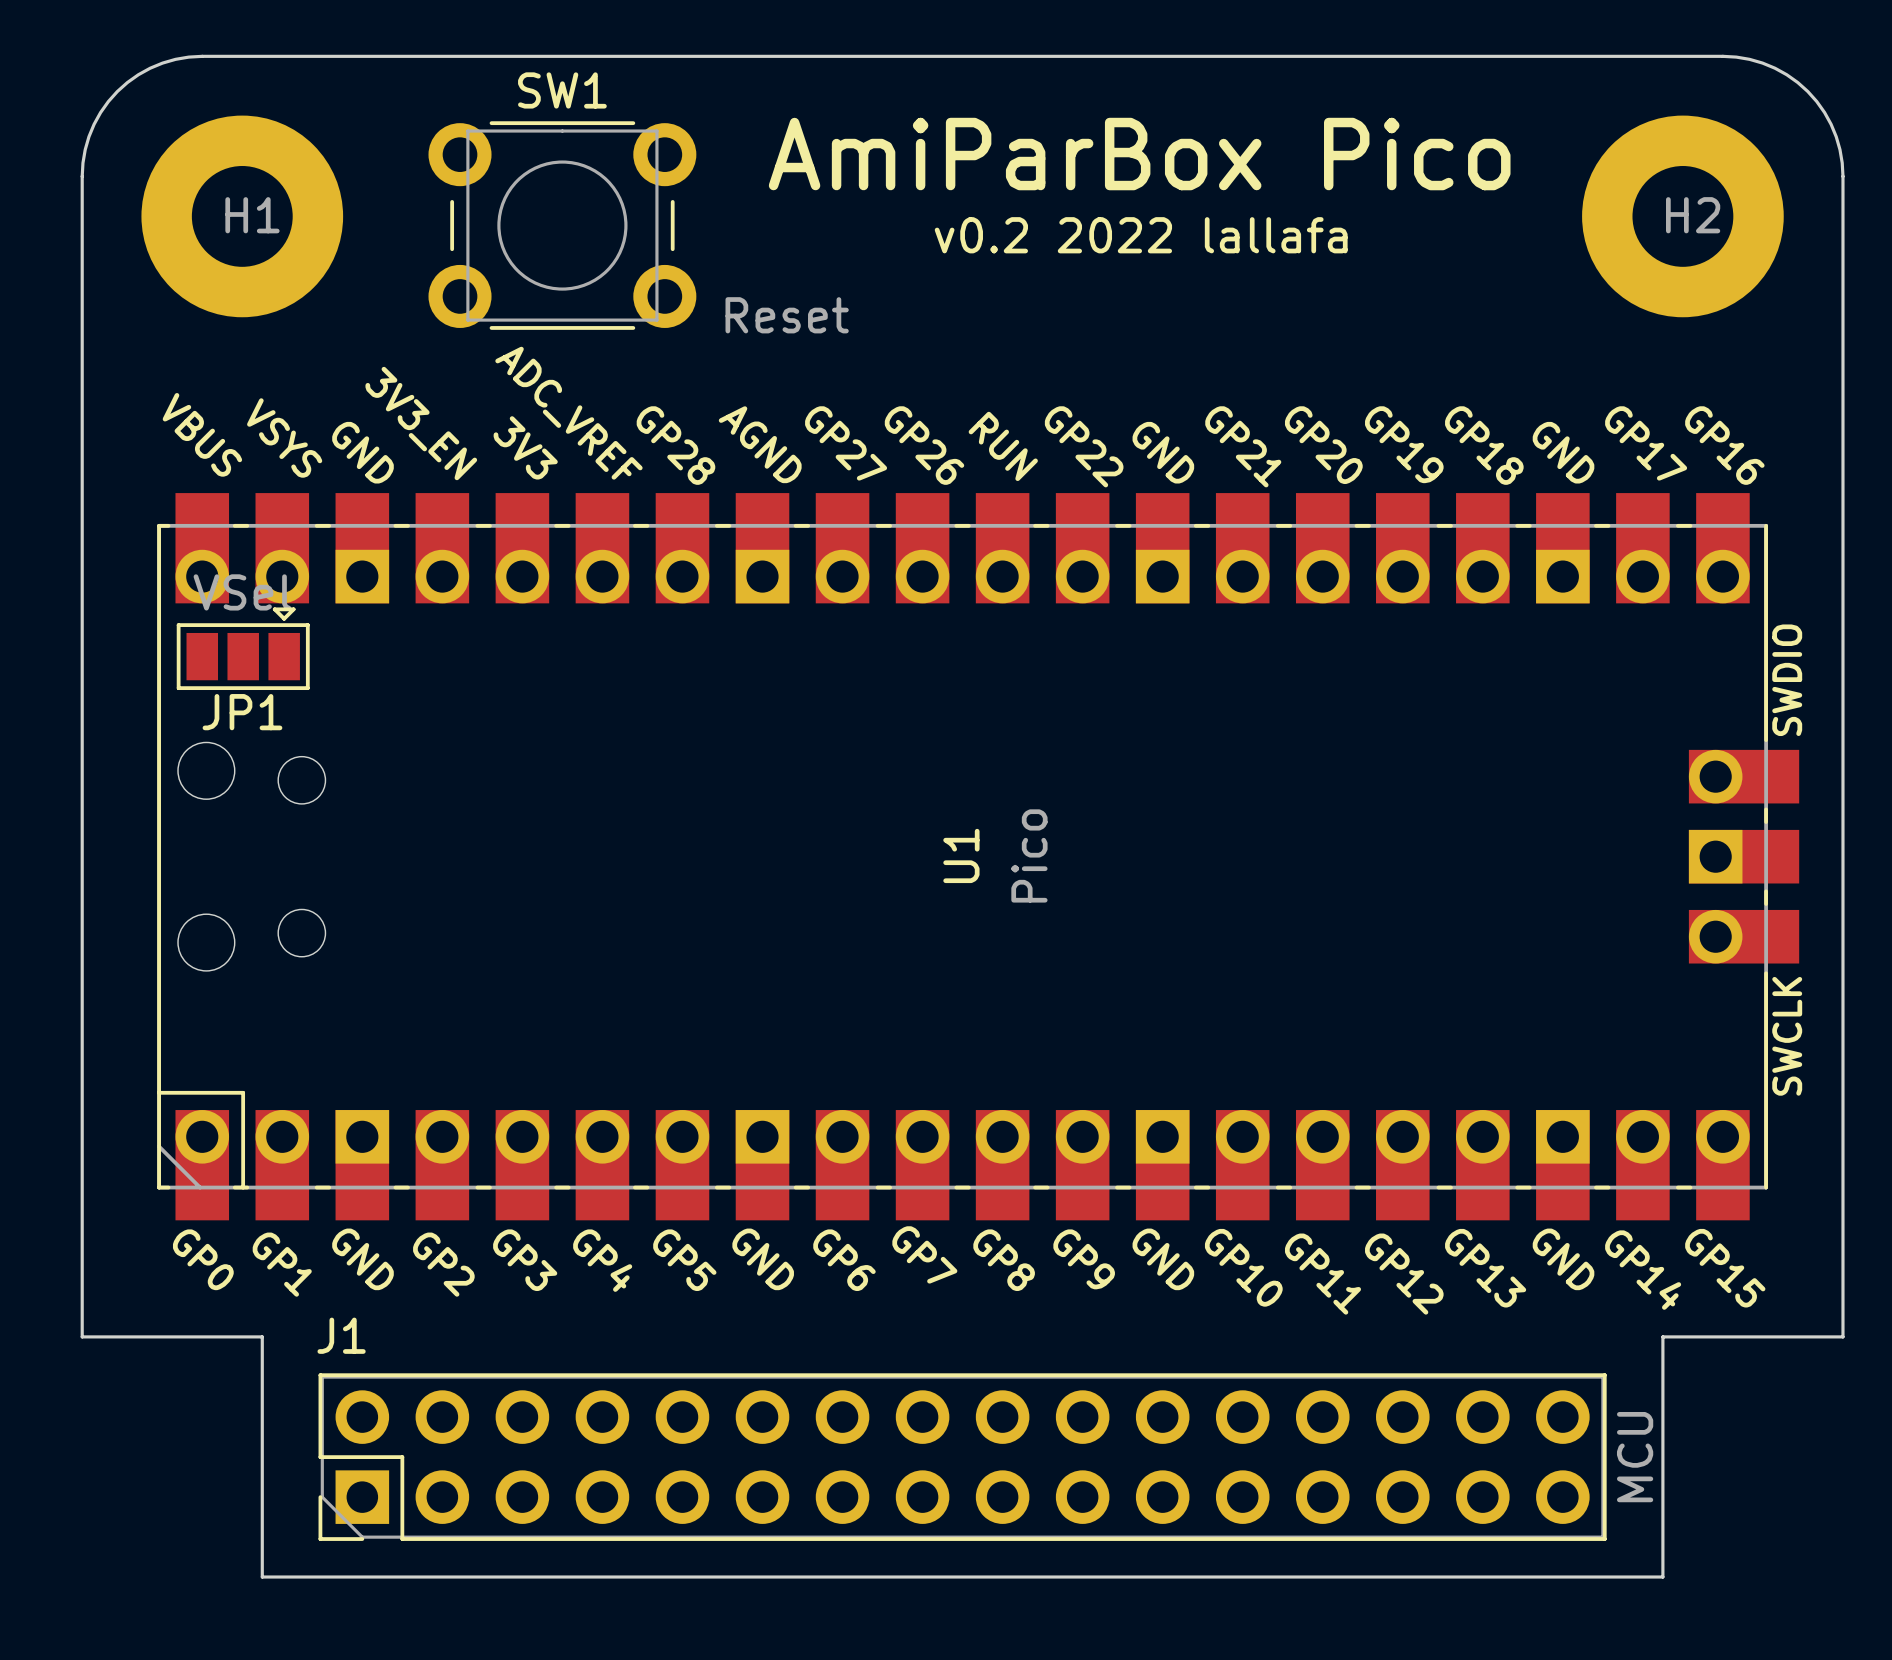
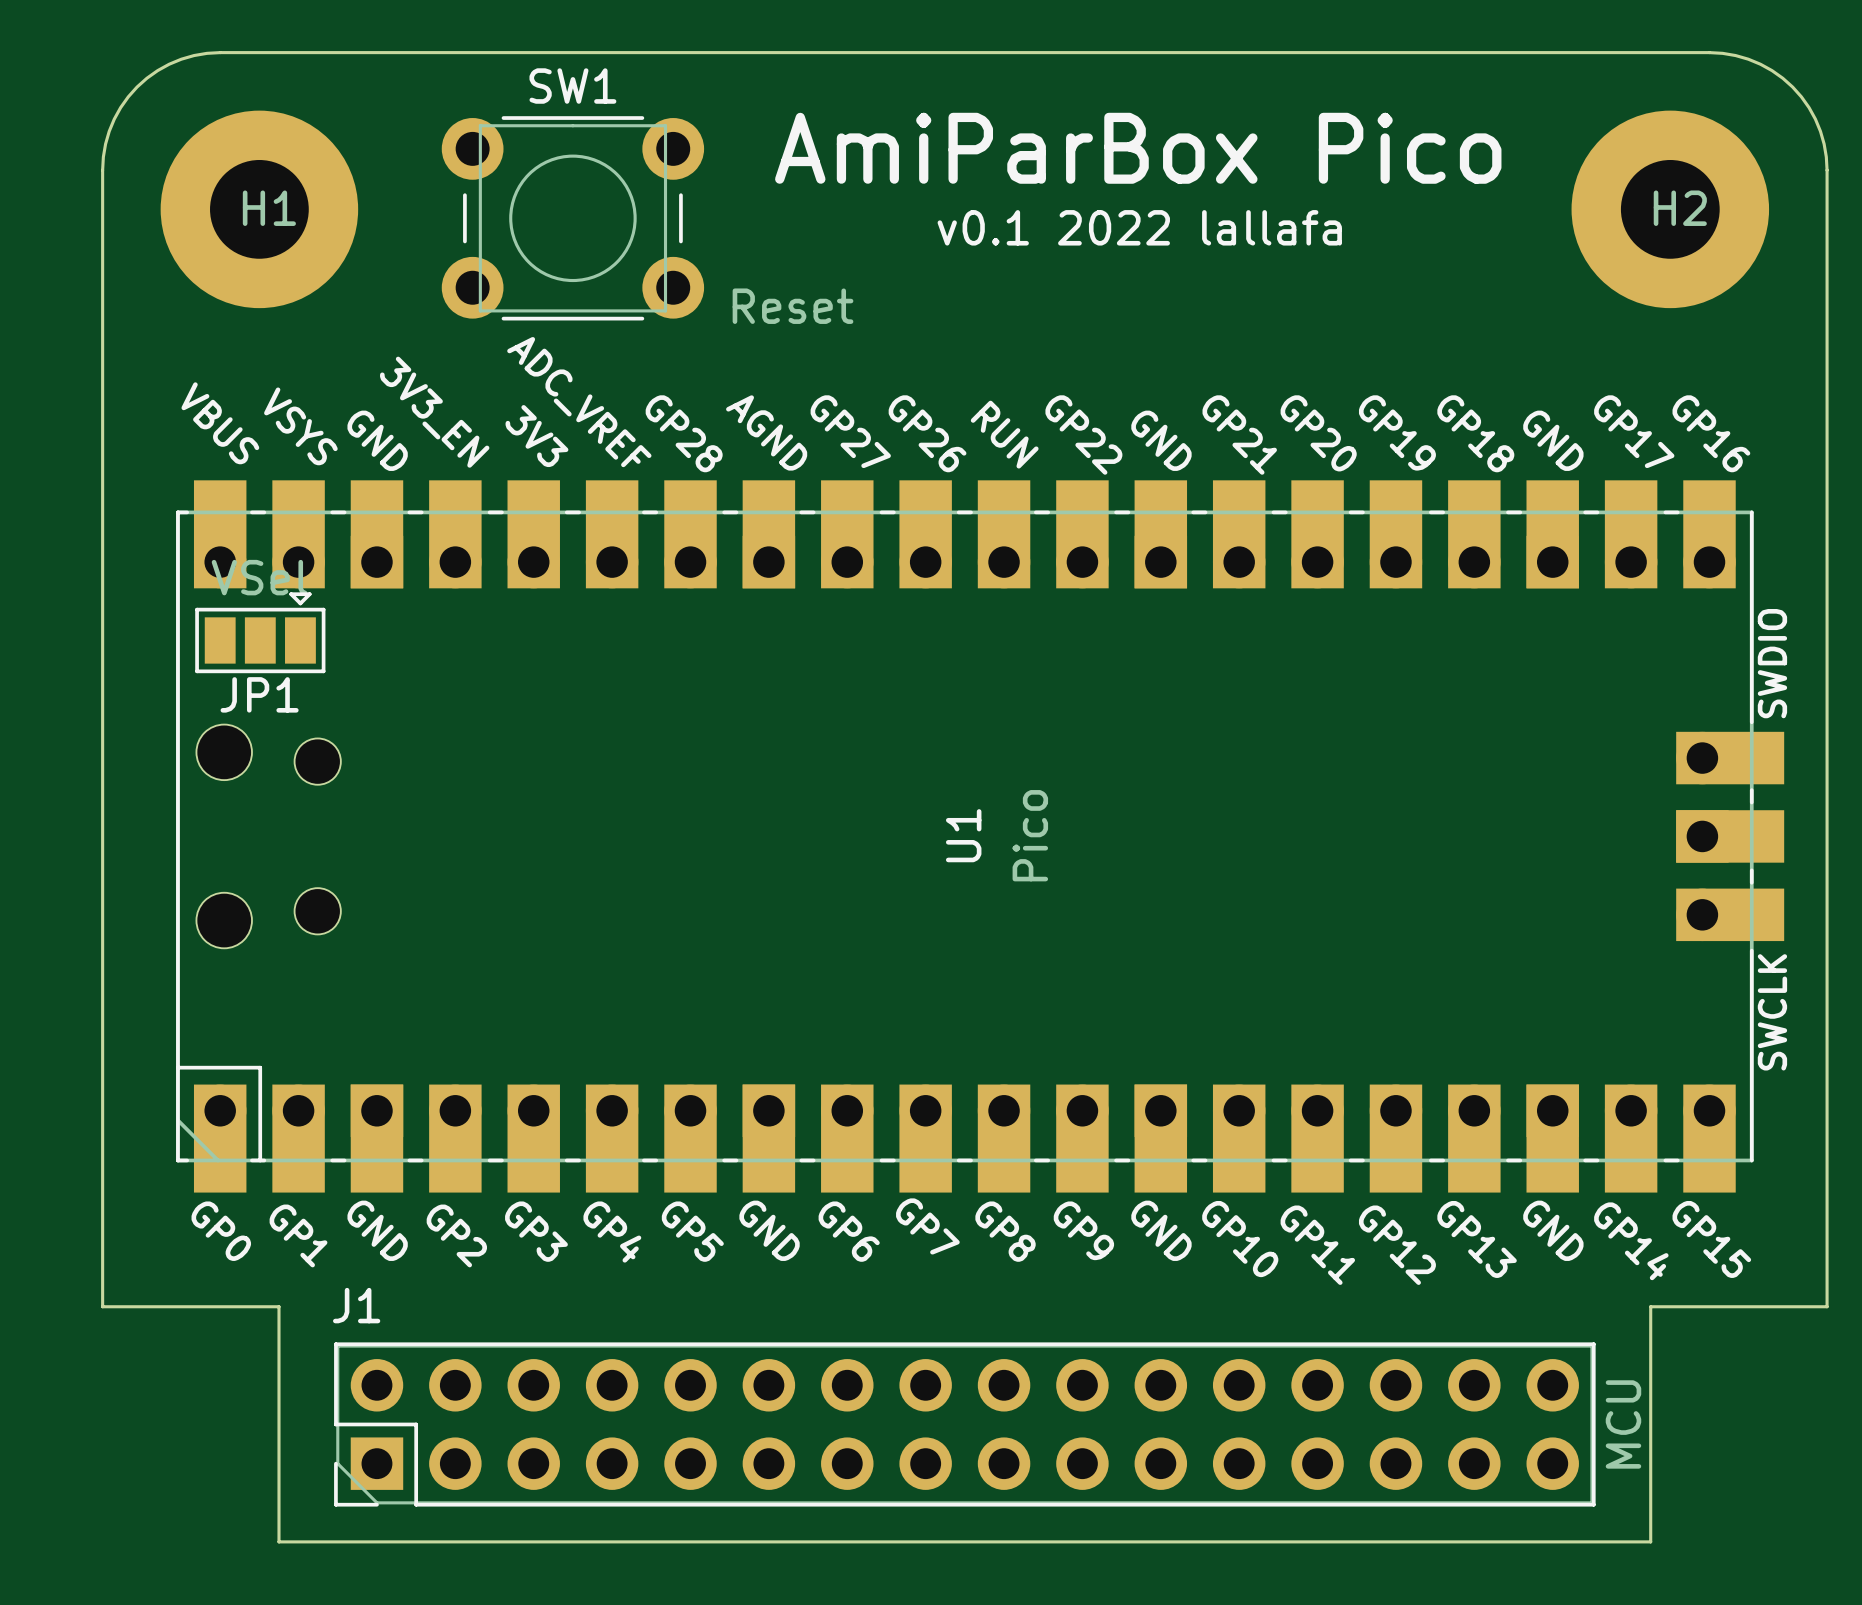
text: v0.2 2022 lallafa (1141, 235) -> v0.1 2022 lallafa (1139, 227)

